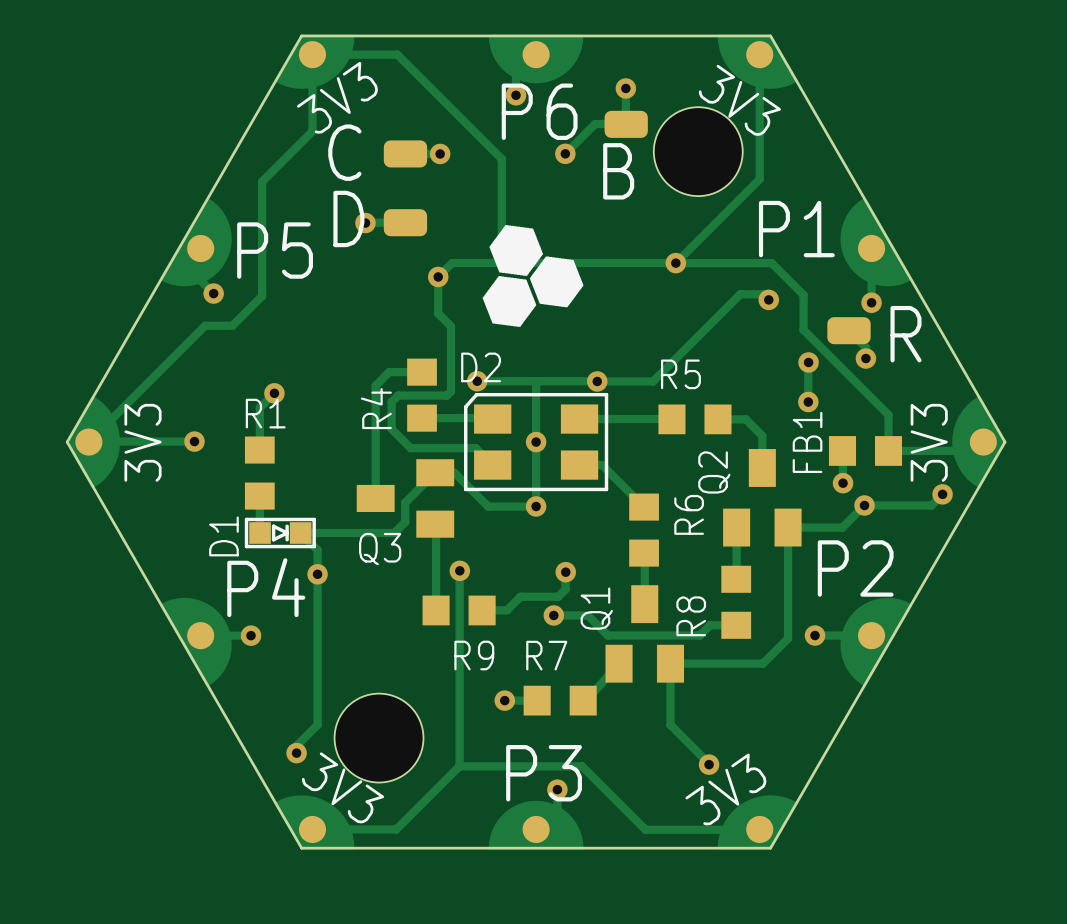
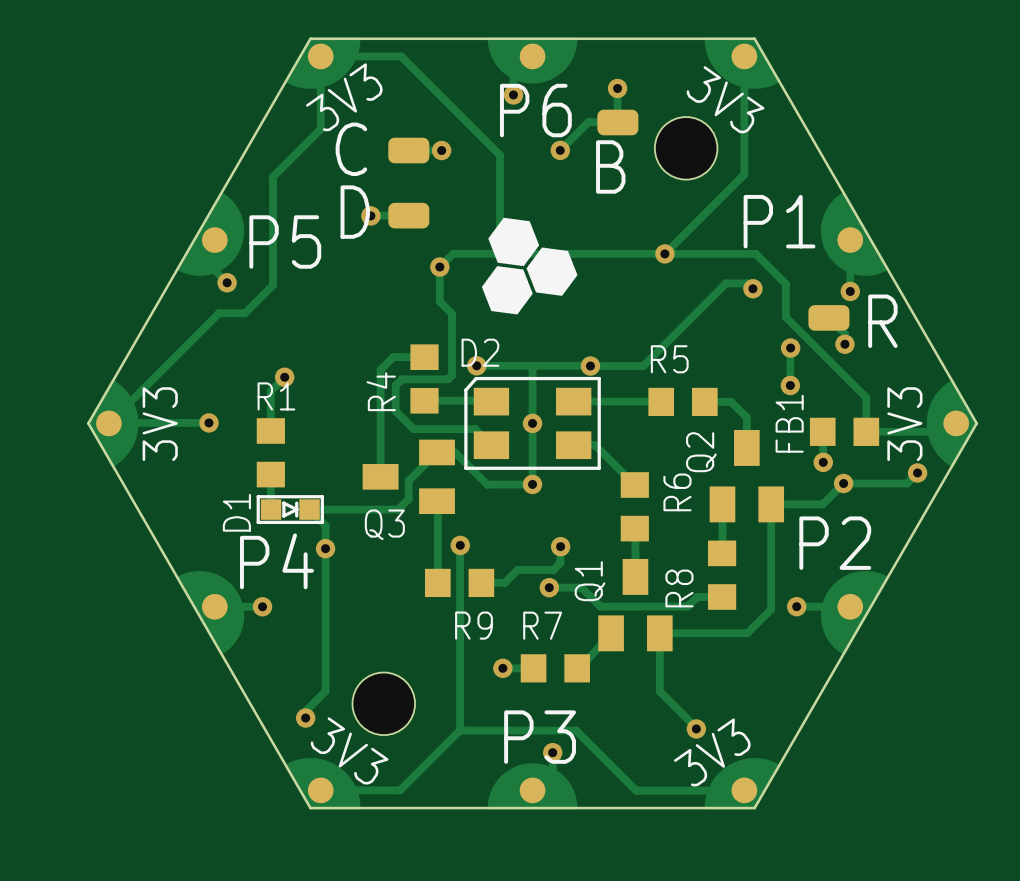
hole size: [653, 107, 743, 197] -> [654, 117, 718, 180]
hole size: [334, 693, 424, 783] -> [352, 672, 416, 736]

